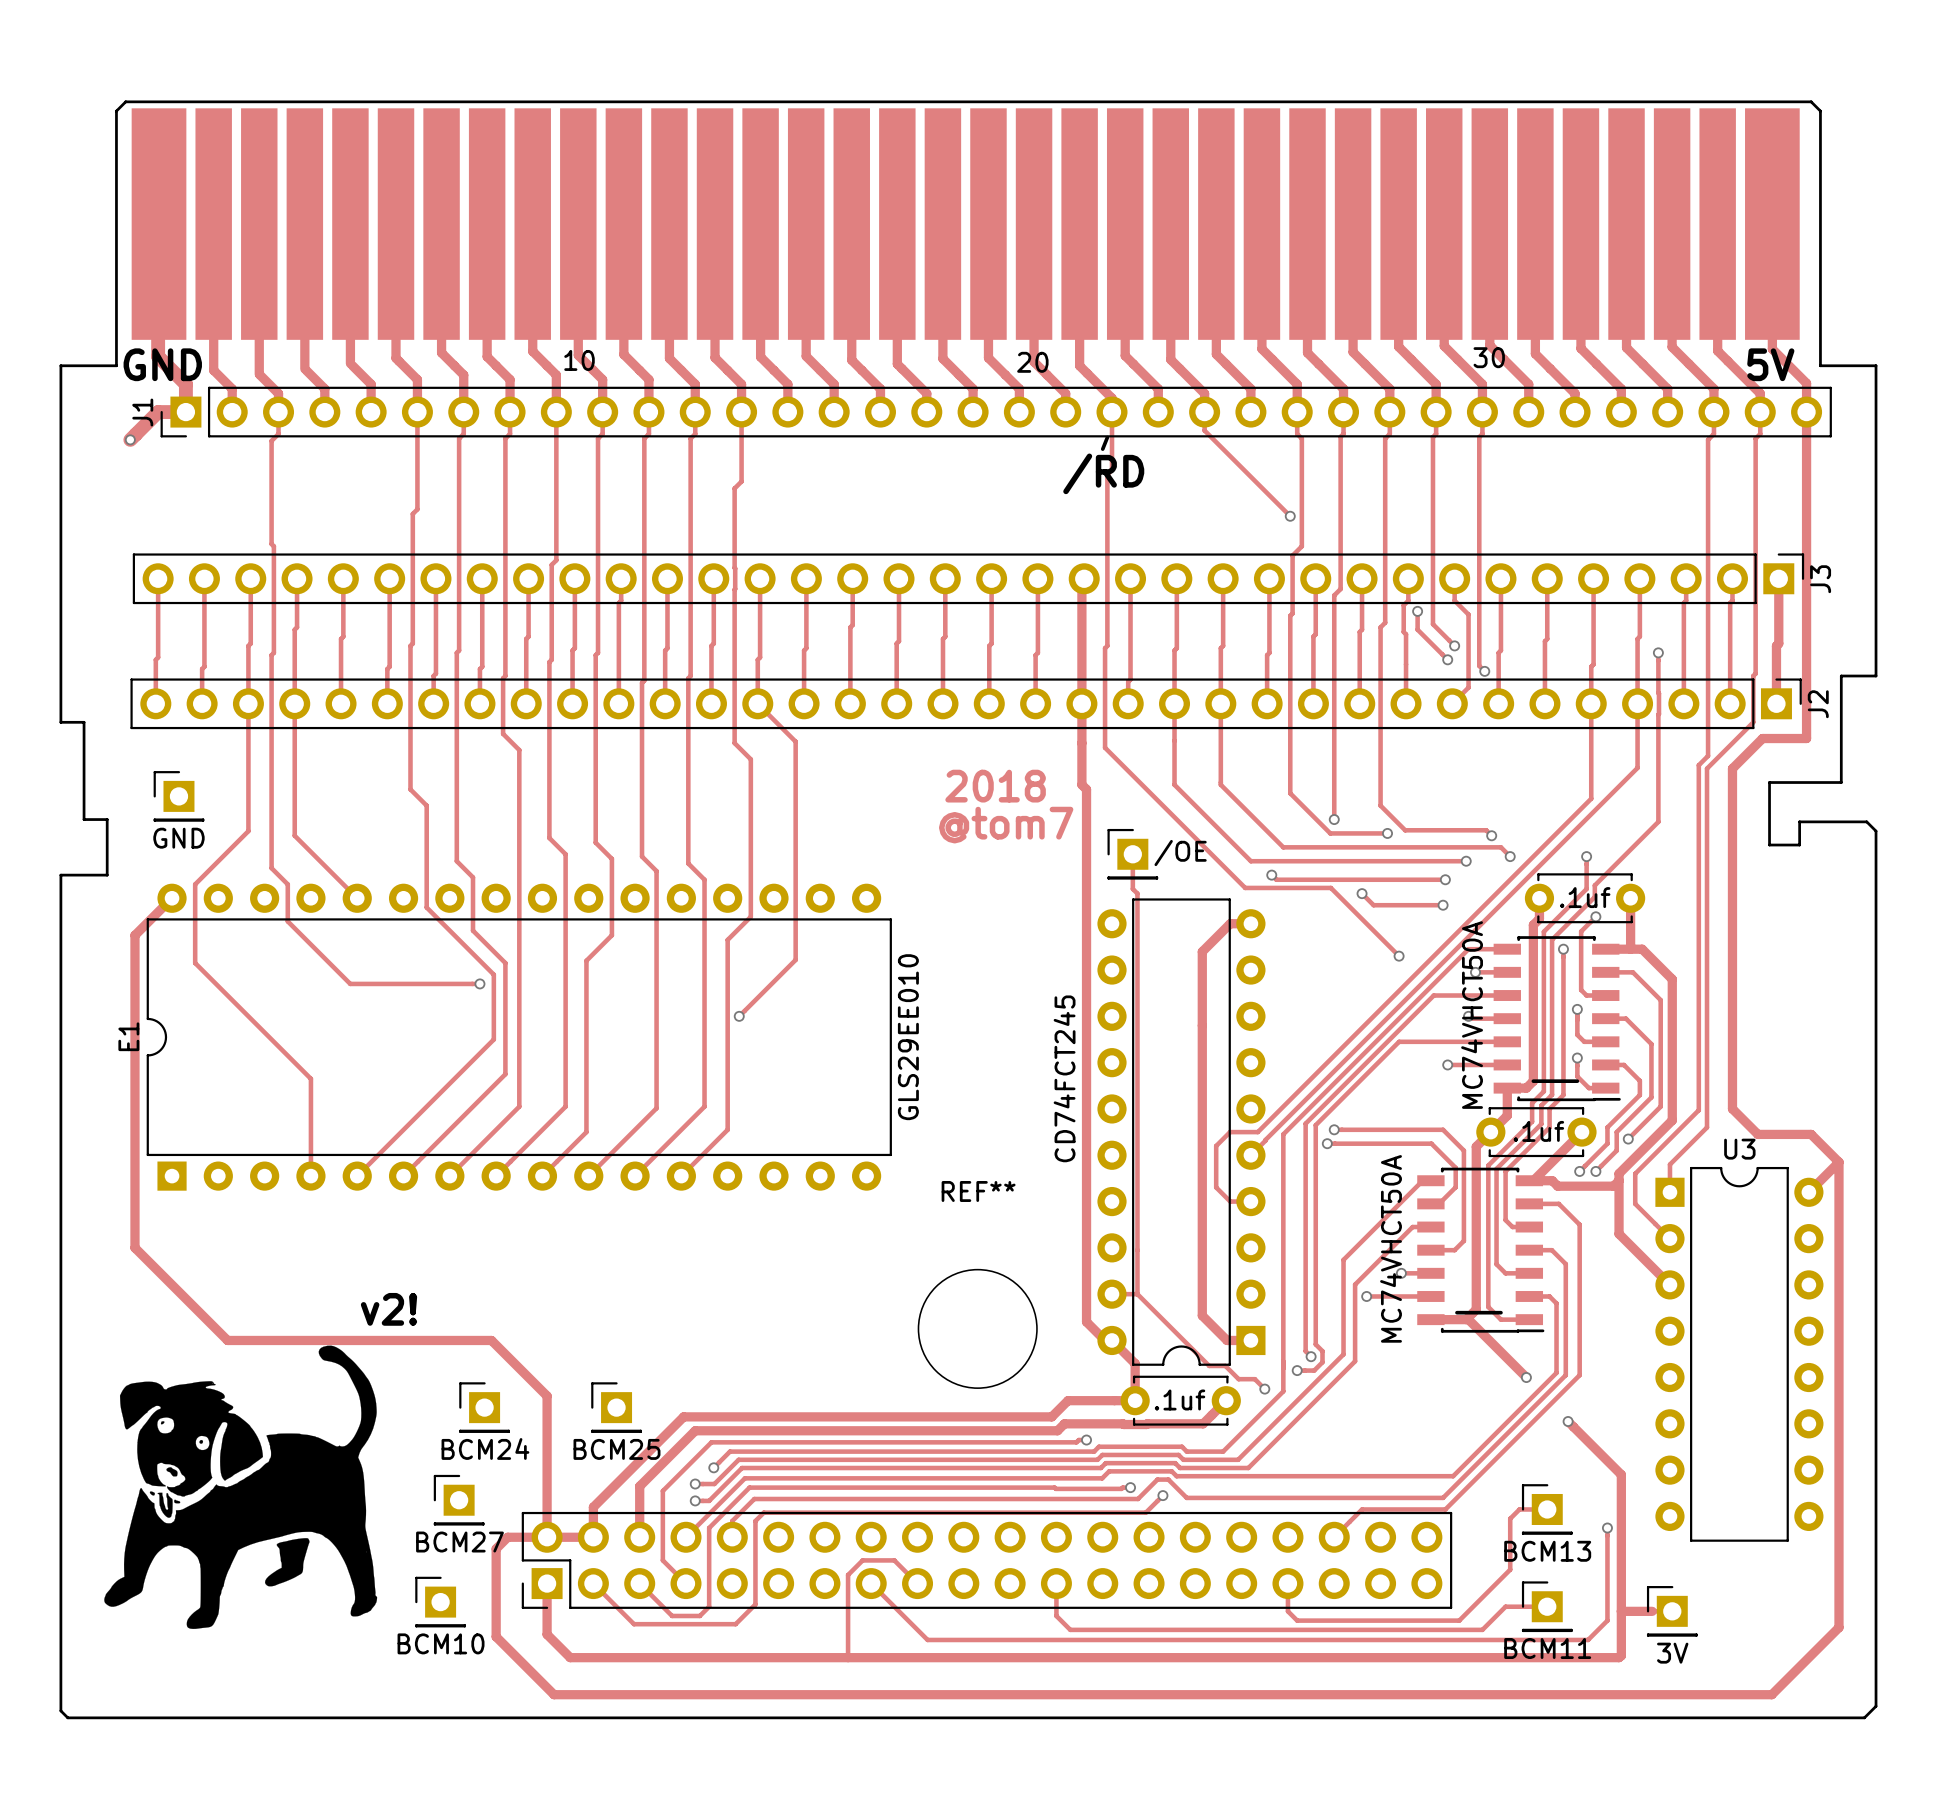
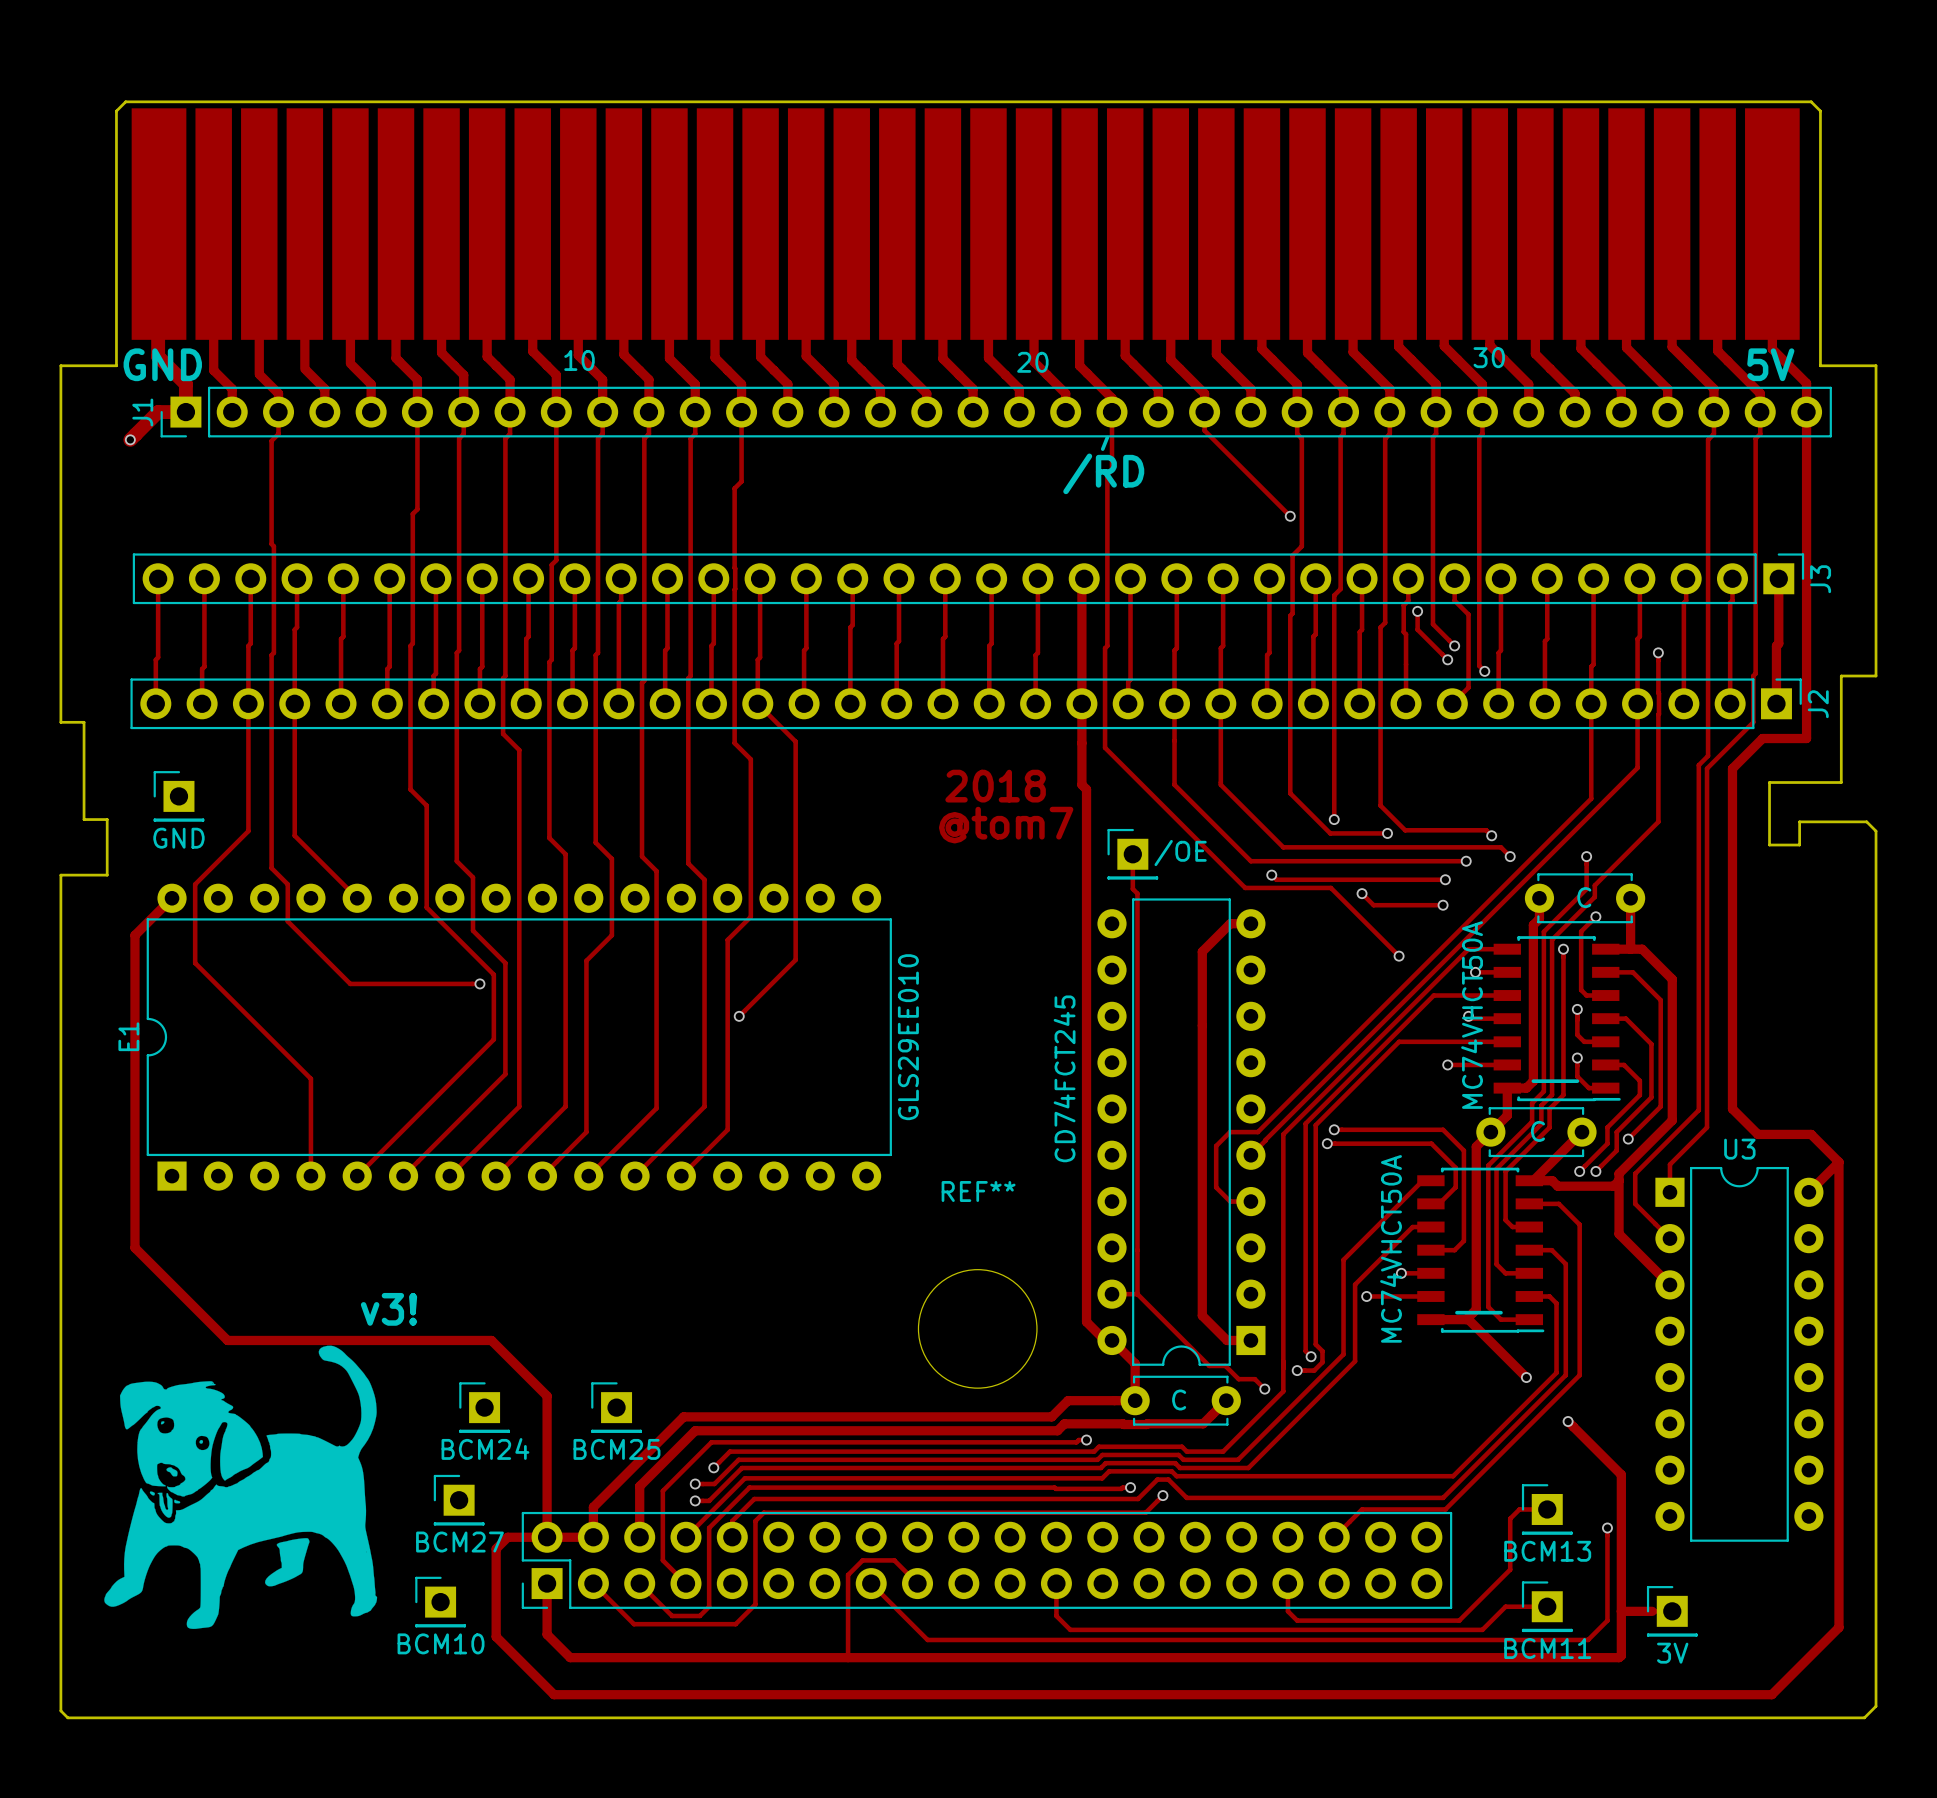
part value: .1uf (1585, 897) -> C (1584, 897)
part value: .1uf (1538, 1131) -> C (1538, 1131)
text: v2! (389, 1309) -> v3! (389, 1309)
part value: .1uf (1180, 1399) -> C (1179, 1399)

